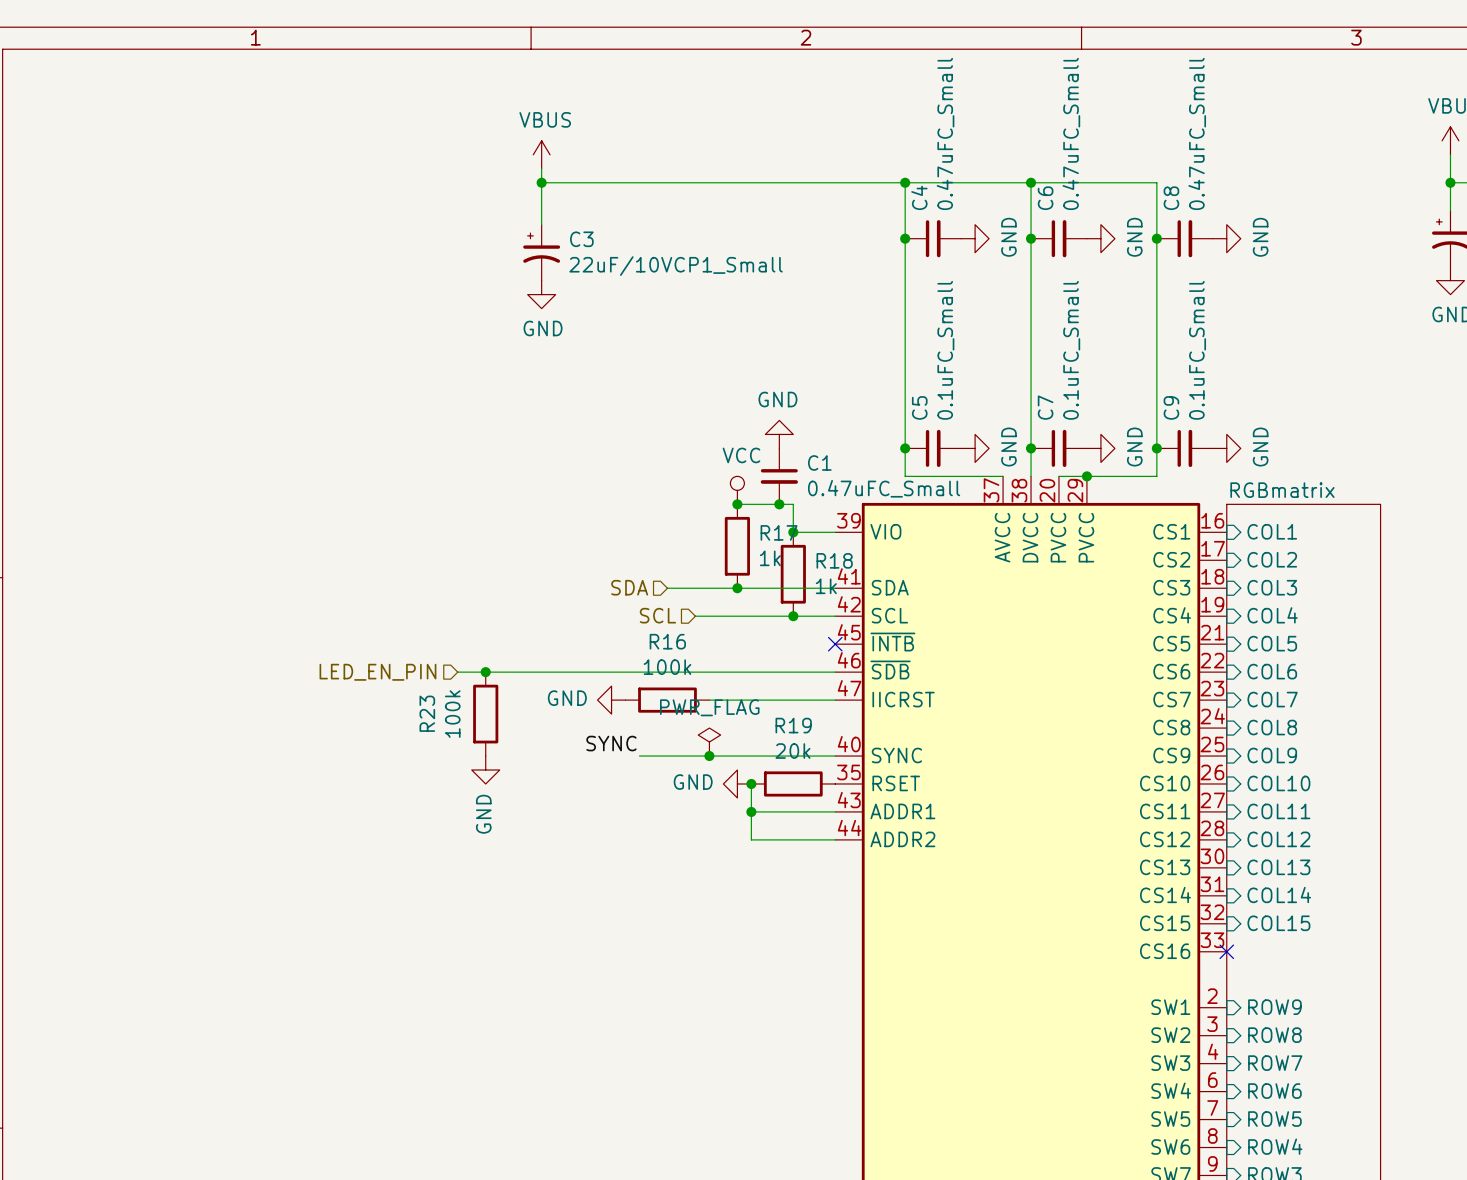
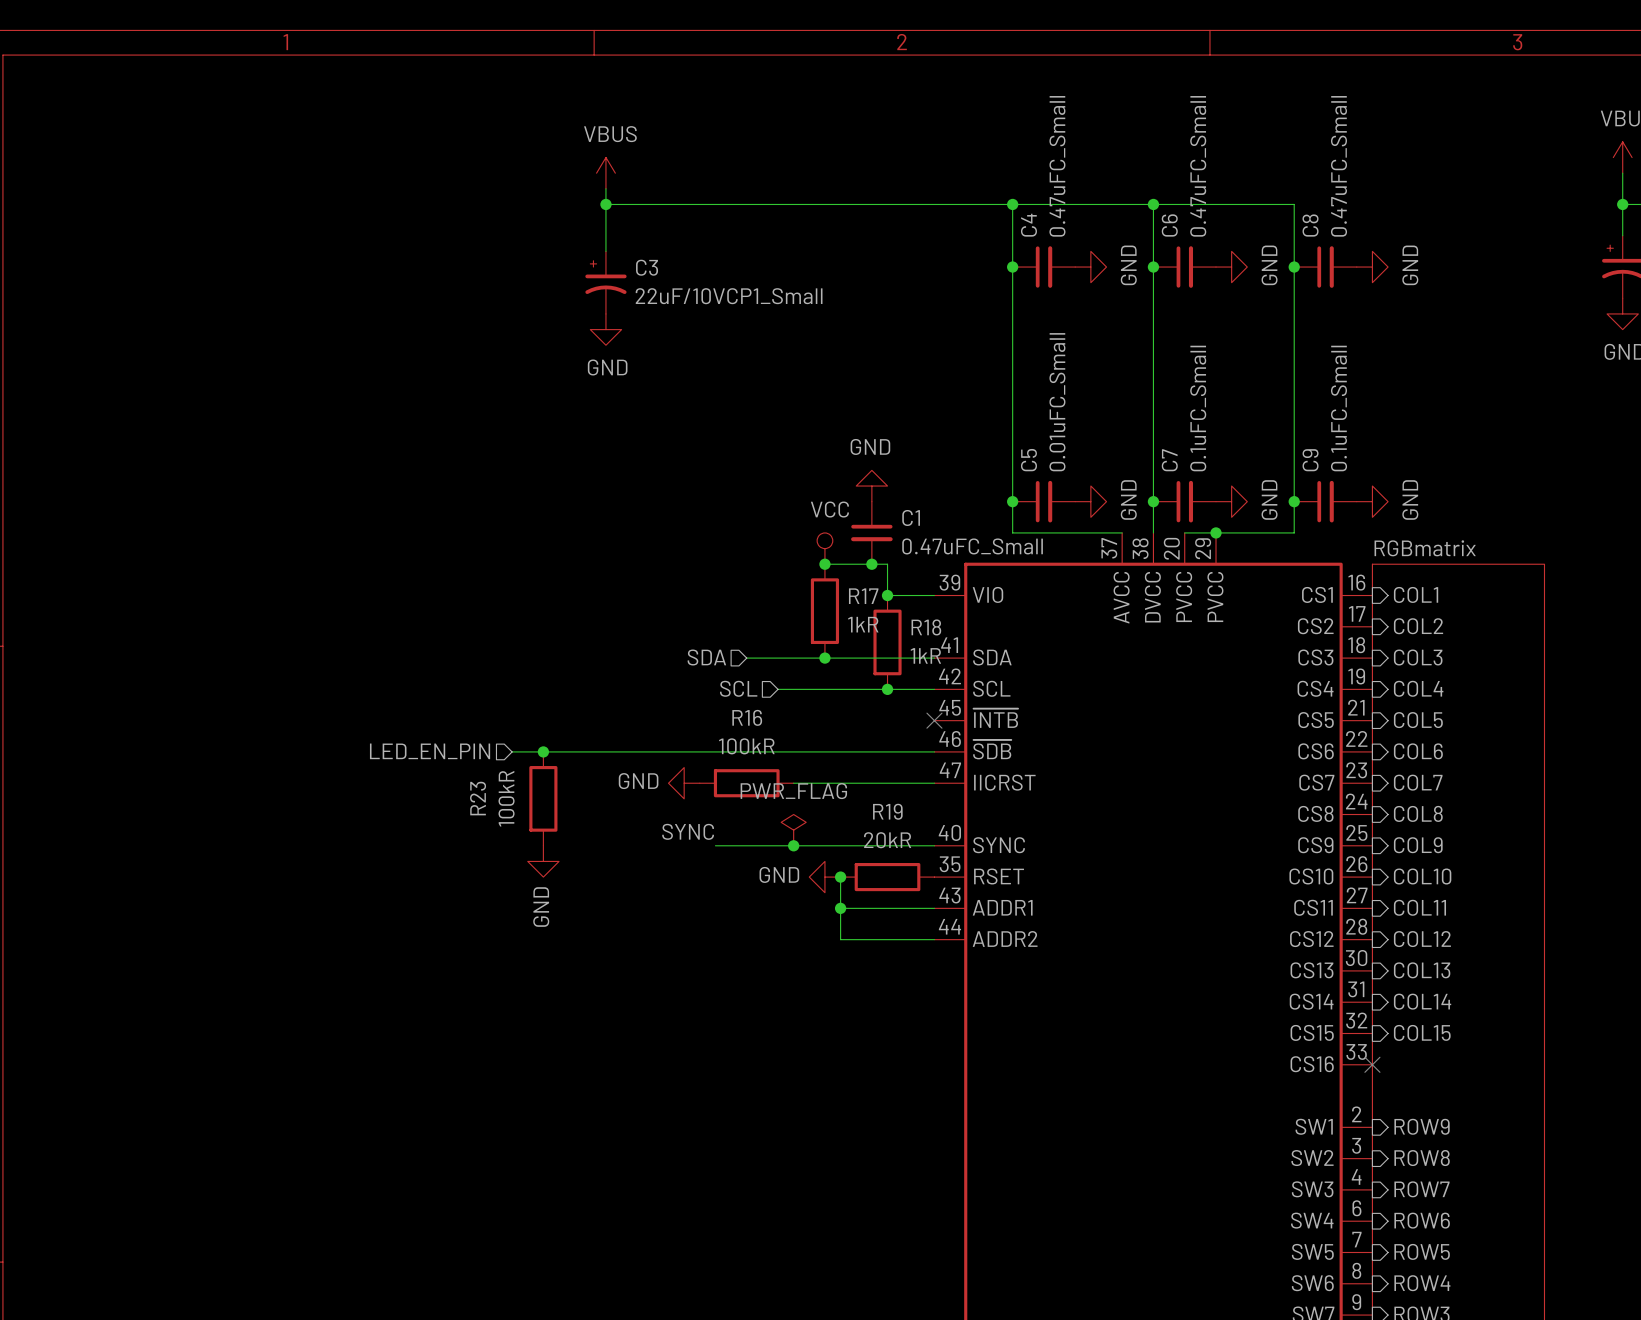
C5 value: 0.1uFC_Small (945, 350) -> 0.01uFC_Small (1057, 402)
R17 value: 1k (770, 558) -> 1kR (863, 624)
R18 value: 1k (826, 586) -> 1kR (925, 655)
R16 value: 100k (667, 667) -> 100kR (746, 746)
R23 value: 100k (452, 714) -> 100kR (506, 798)
R19 value: 20k (792, 751) -> 20kR (887, 840)

